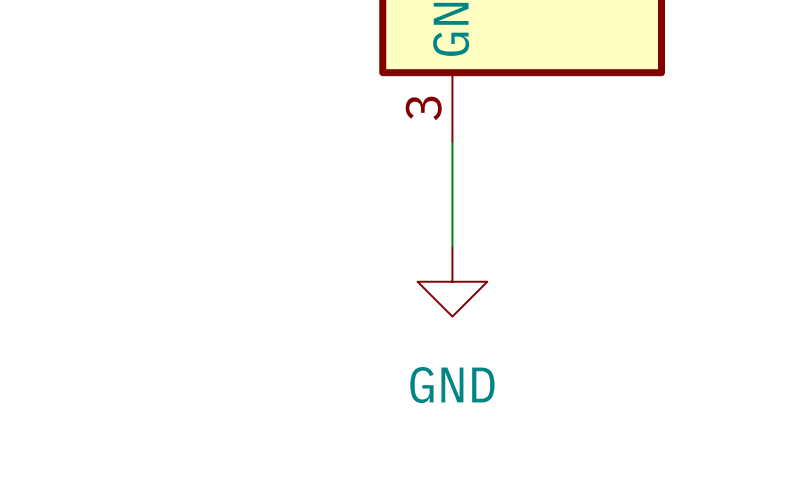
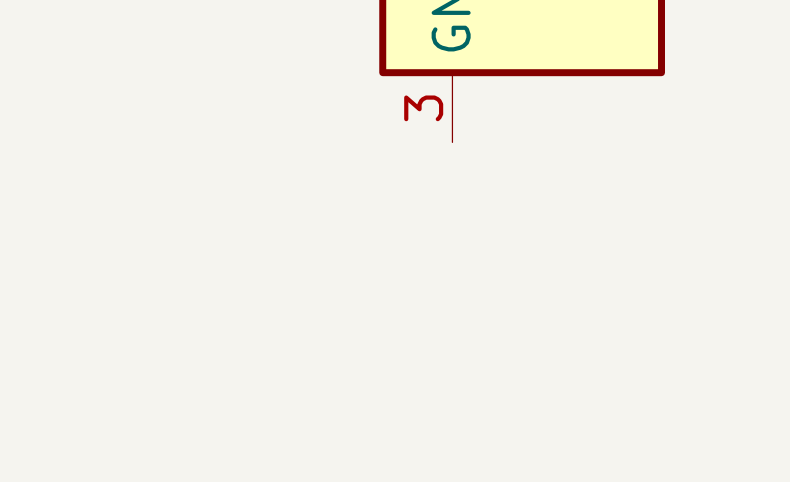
wire: (452, 142) (452, 246) -> none
power symbol: GND (452, 281) -> none

